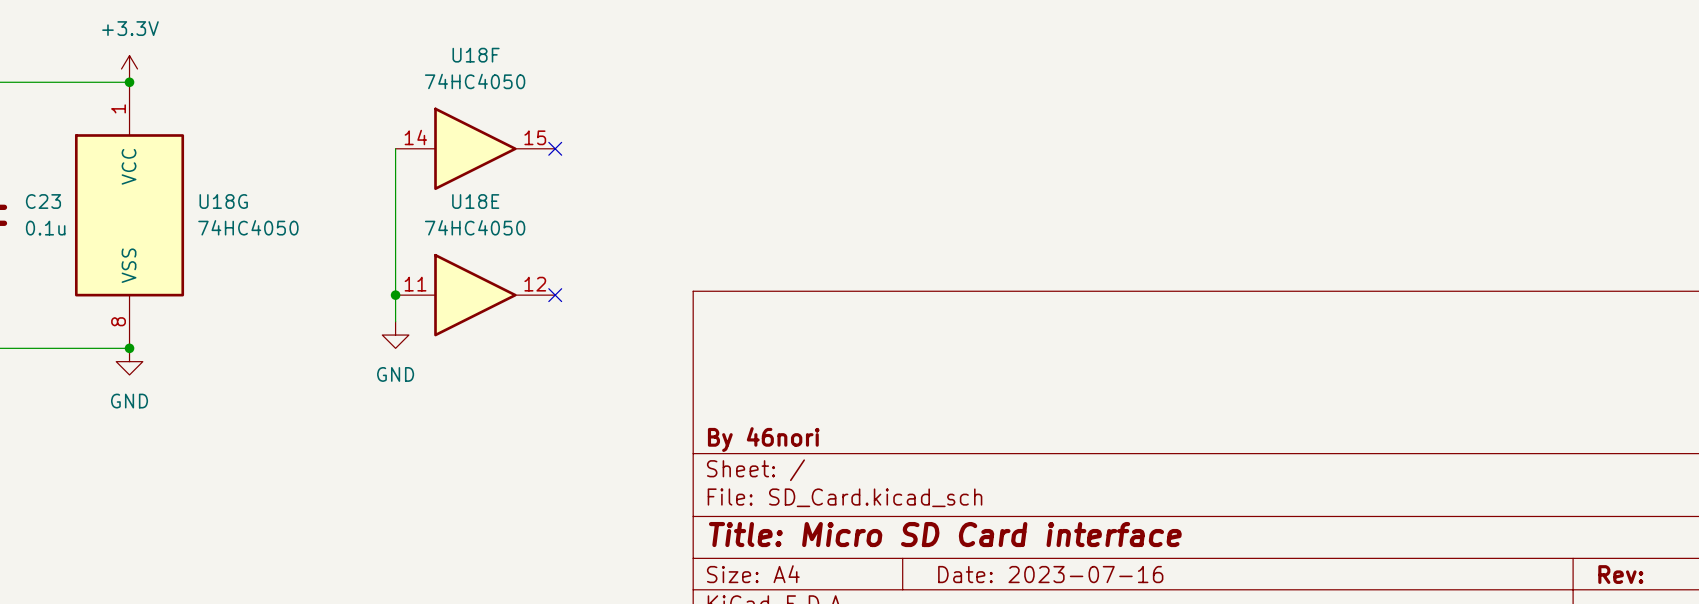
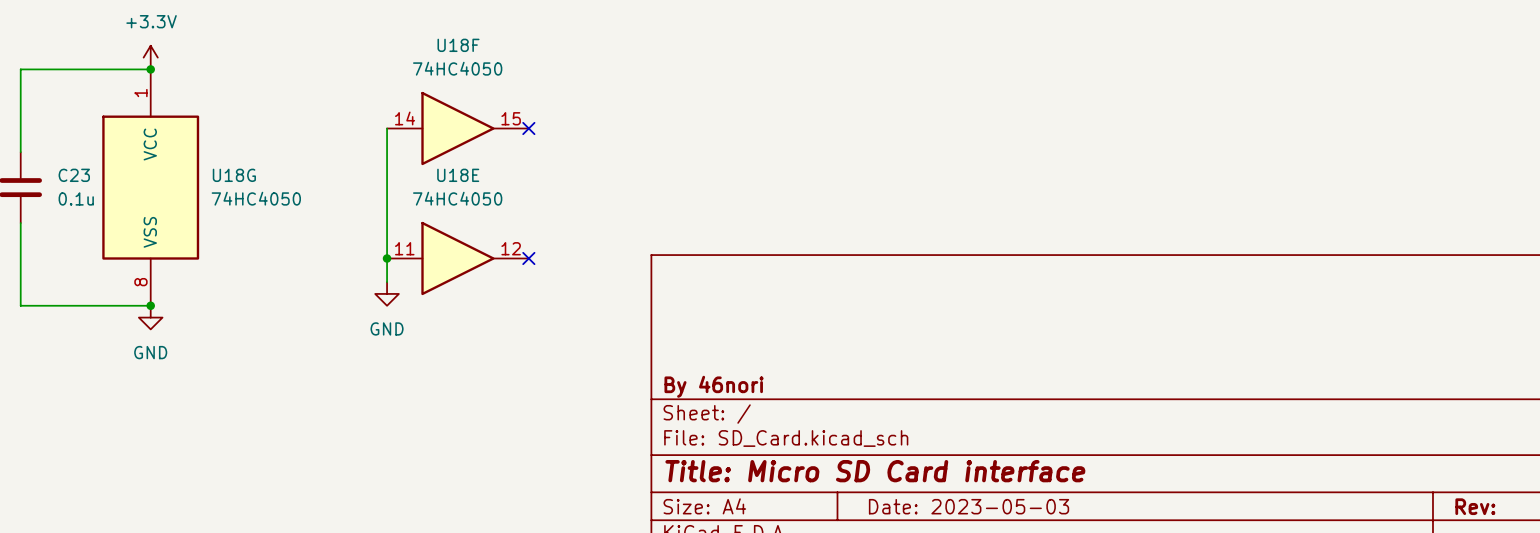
title block: Date: 2023-07-16 (1050, 574) -> Date: 2023-05-03 (969, 506)

